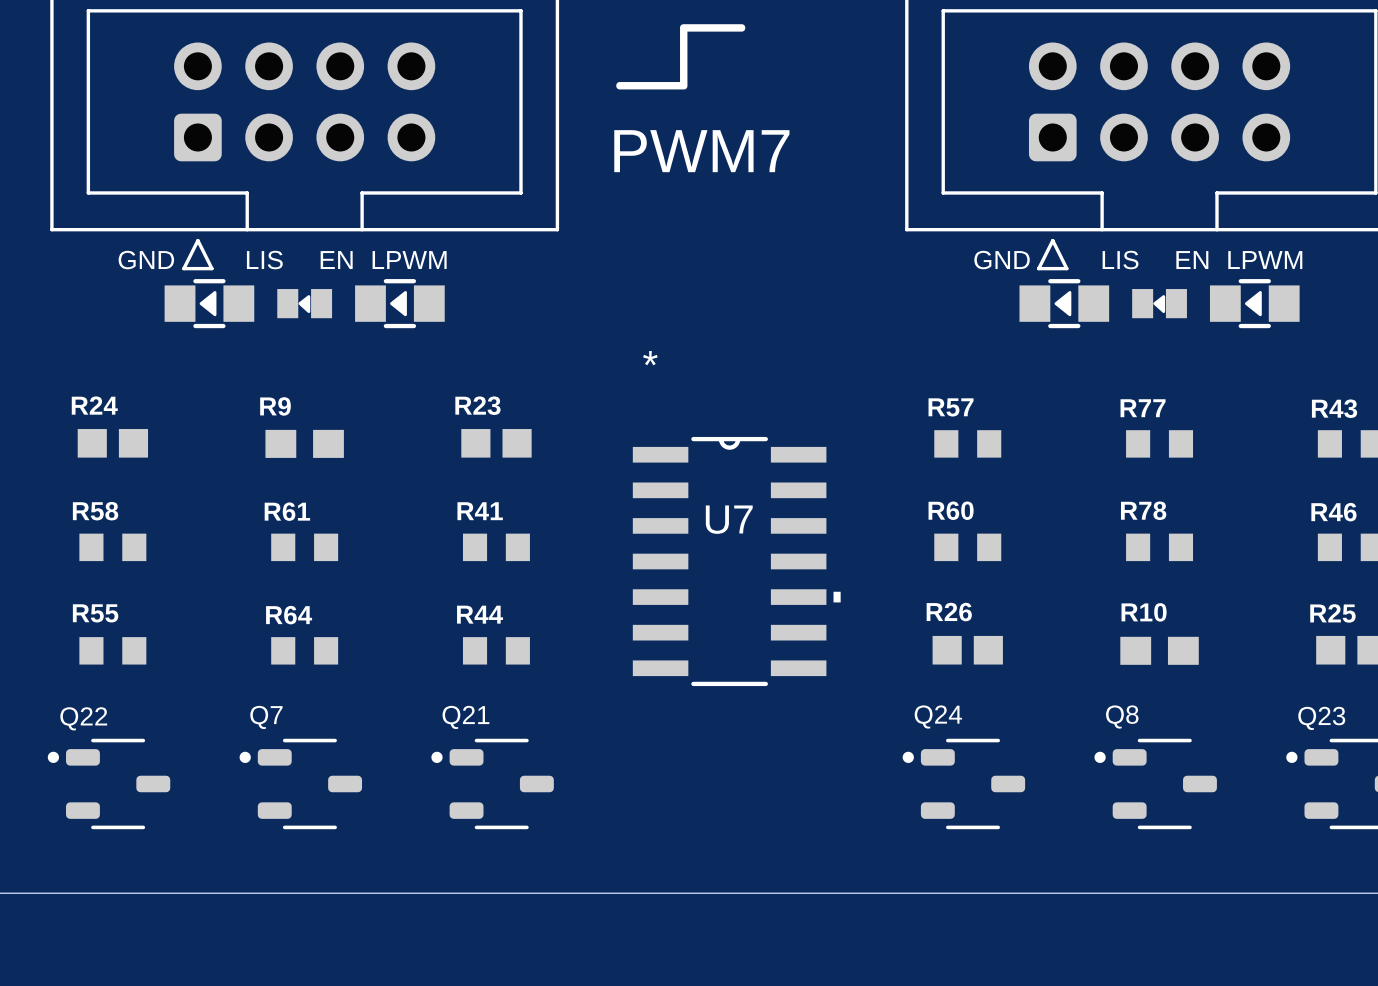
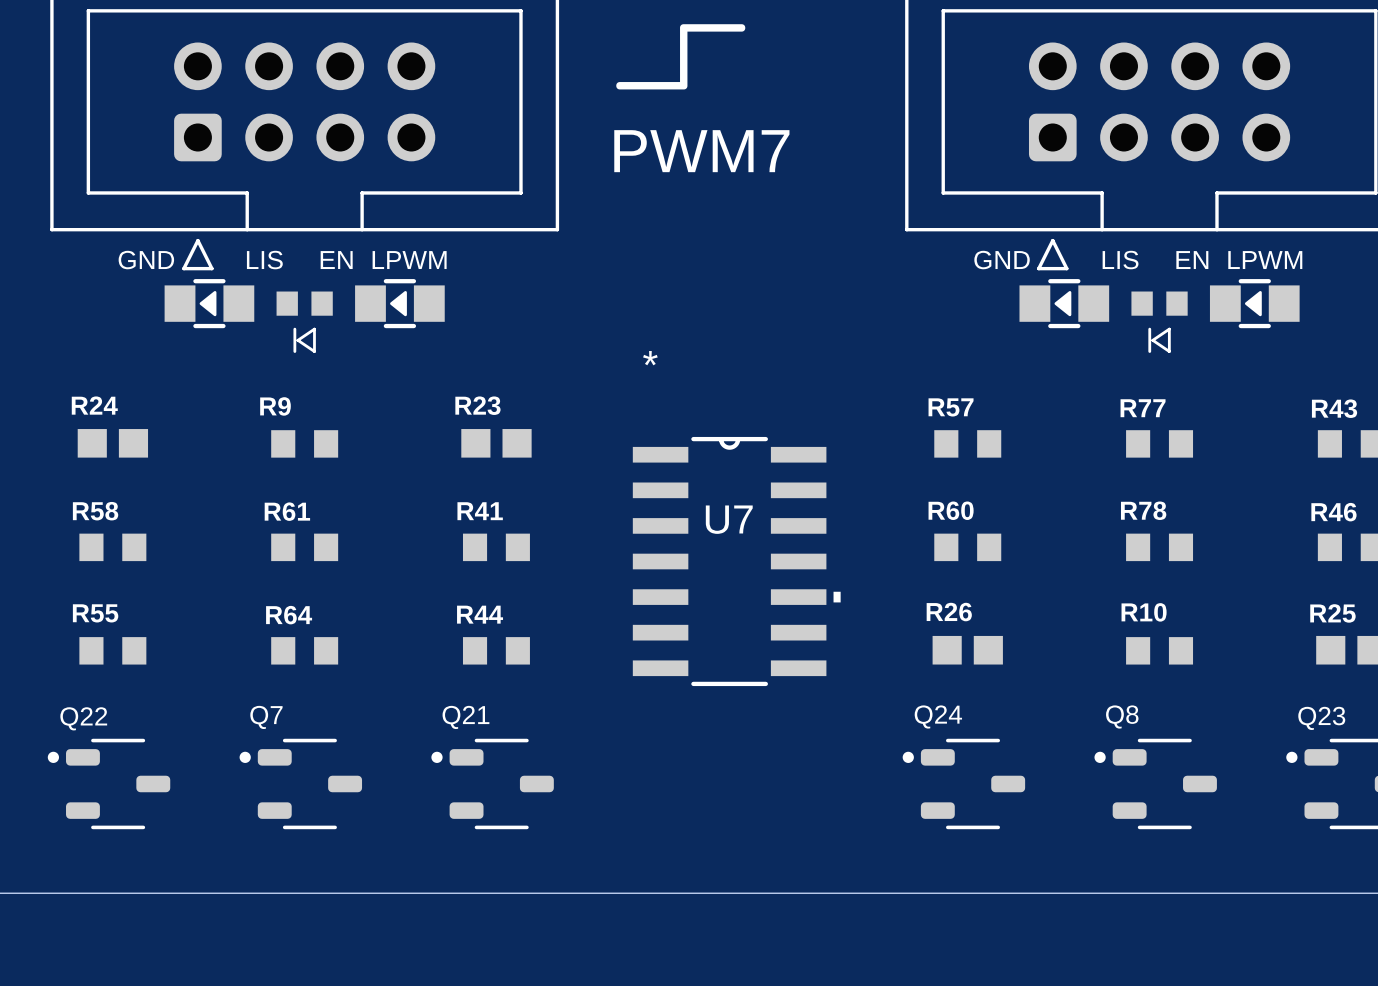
part footprint: [277, 289, 333, 319] -> [276, 291, 333, 353]
part footprint: [1132, 289, 1187, 319] -> [1131, 291, 1188, 353]
R9 footprint: [265, 429, 344, 458] -> [271, 430, 339, 458]
R10 footprint: [1120, 636, 1199, 665] -> [1126, 637, 1194, 665]

